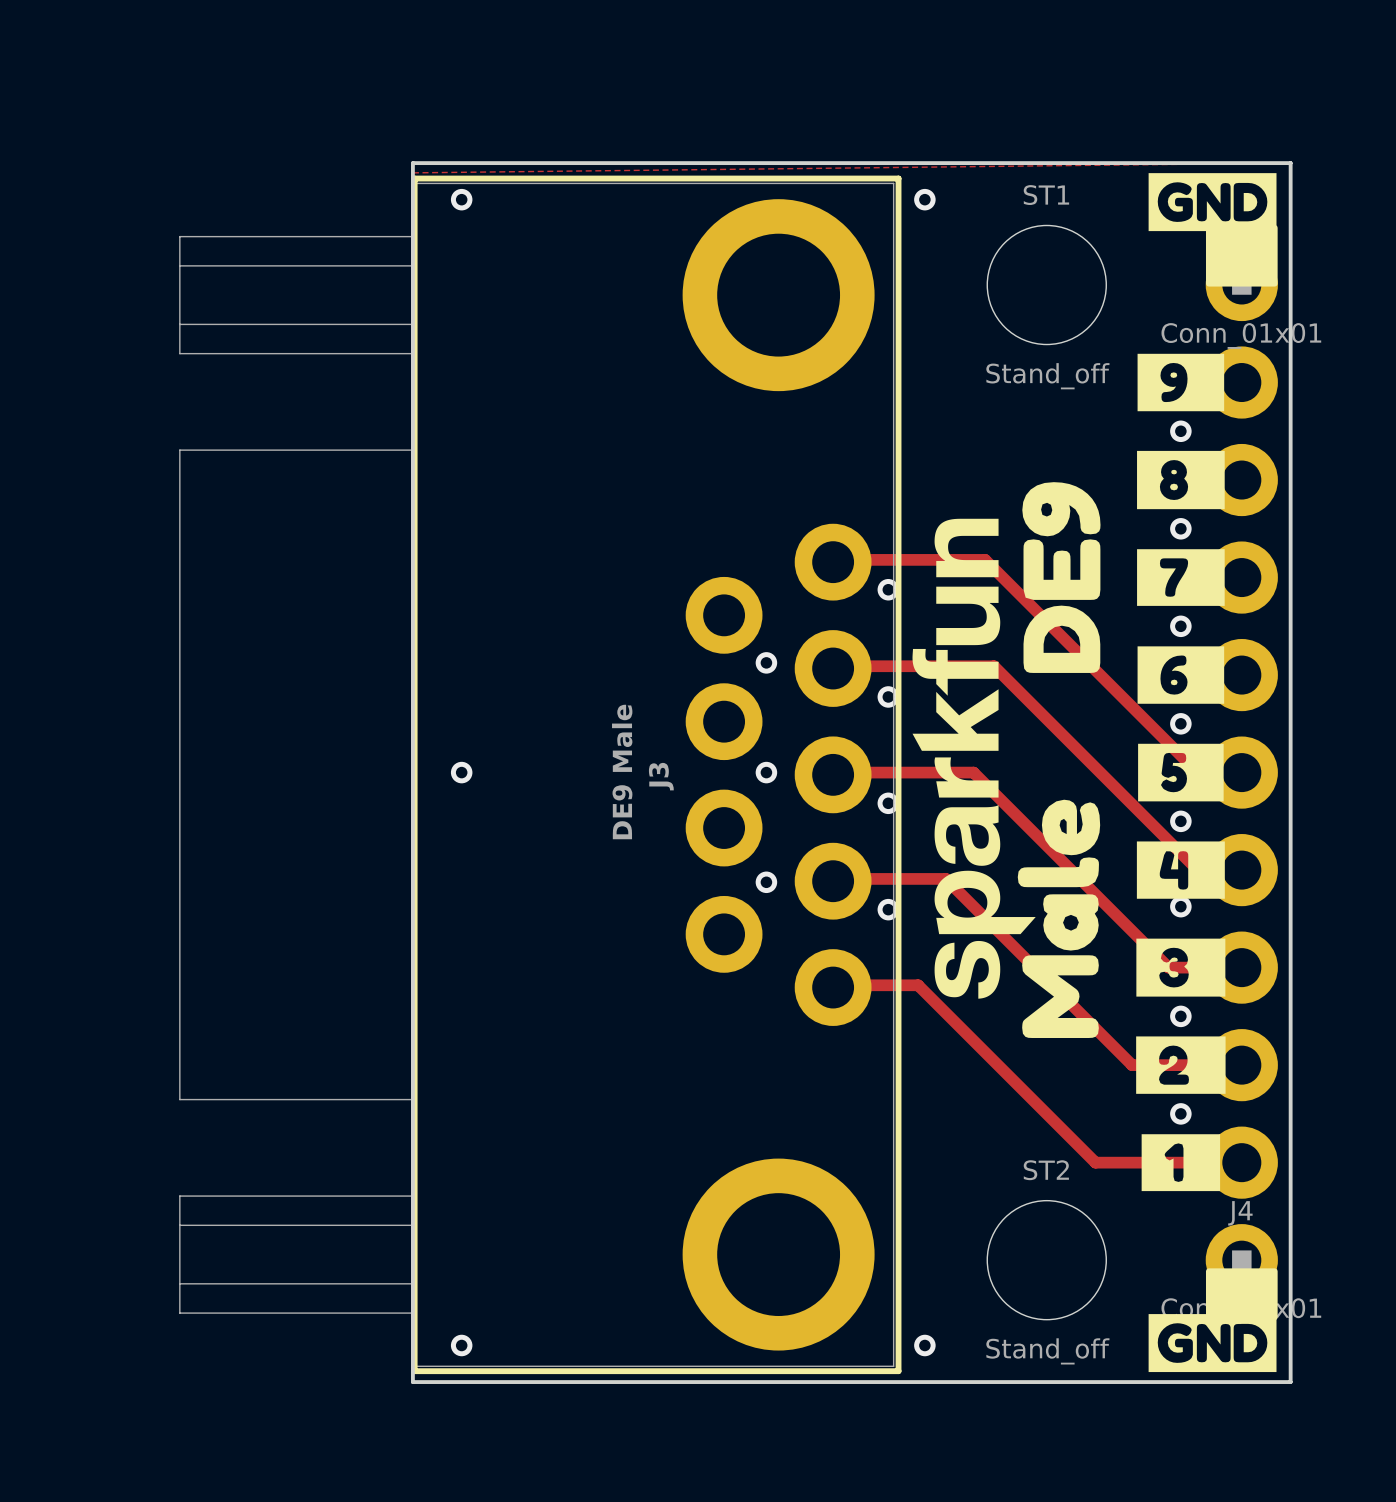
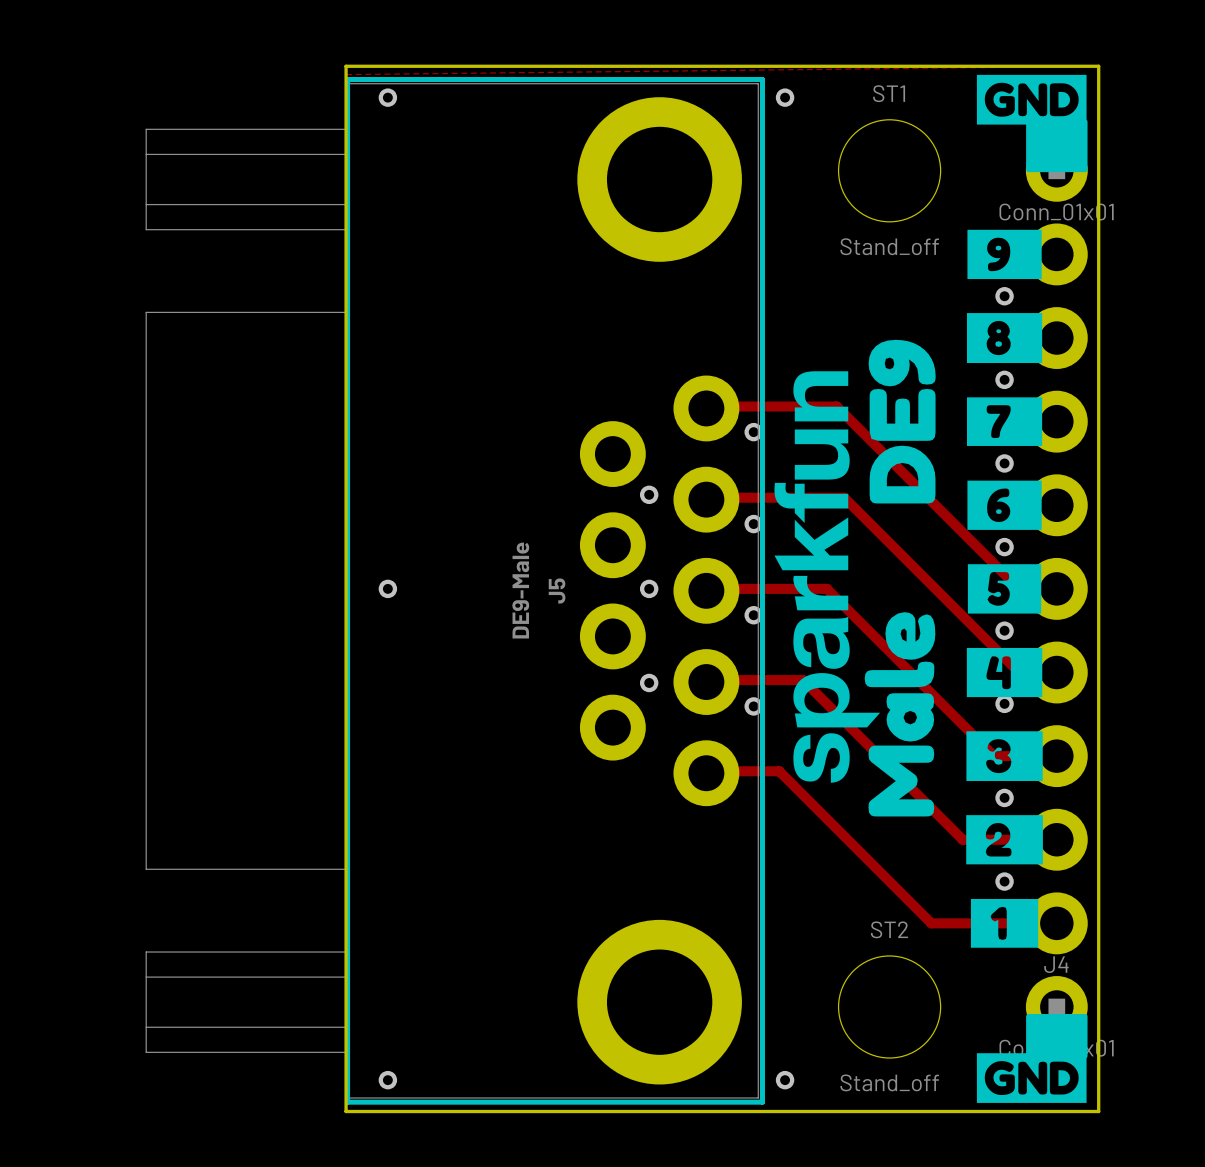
J3 value: DE9 Male (622, 772) -> DE9-Male (520, 590)
J3 name: J3 (661, 776) -> J5 (557, 591)

